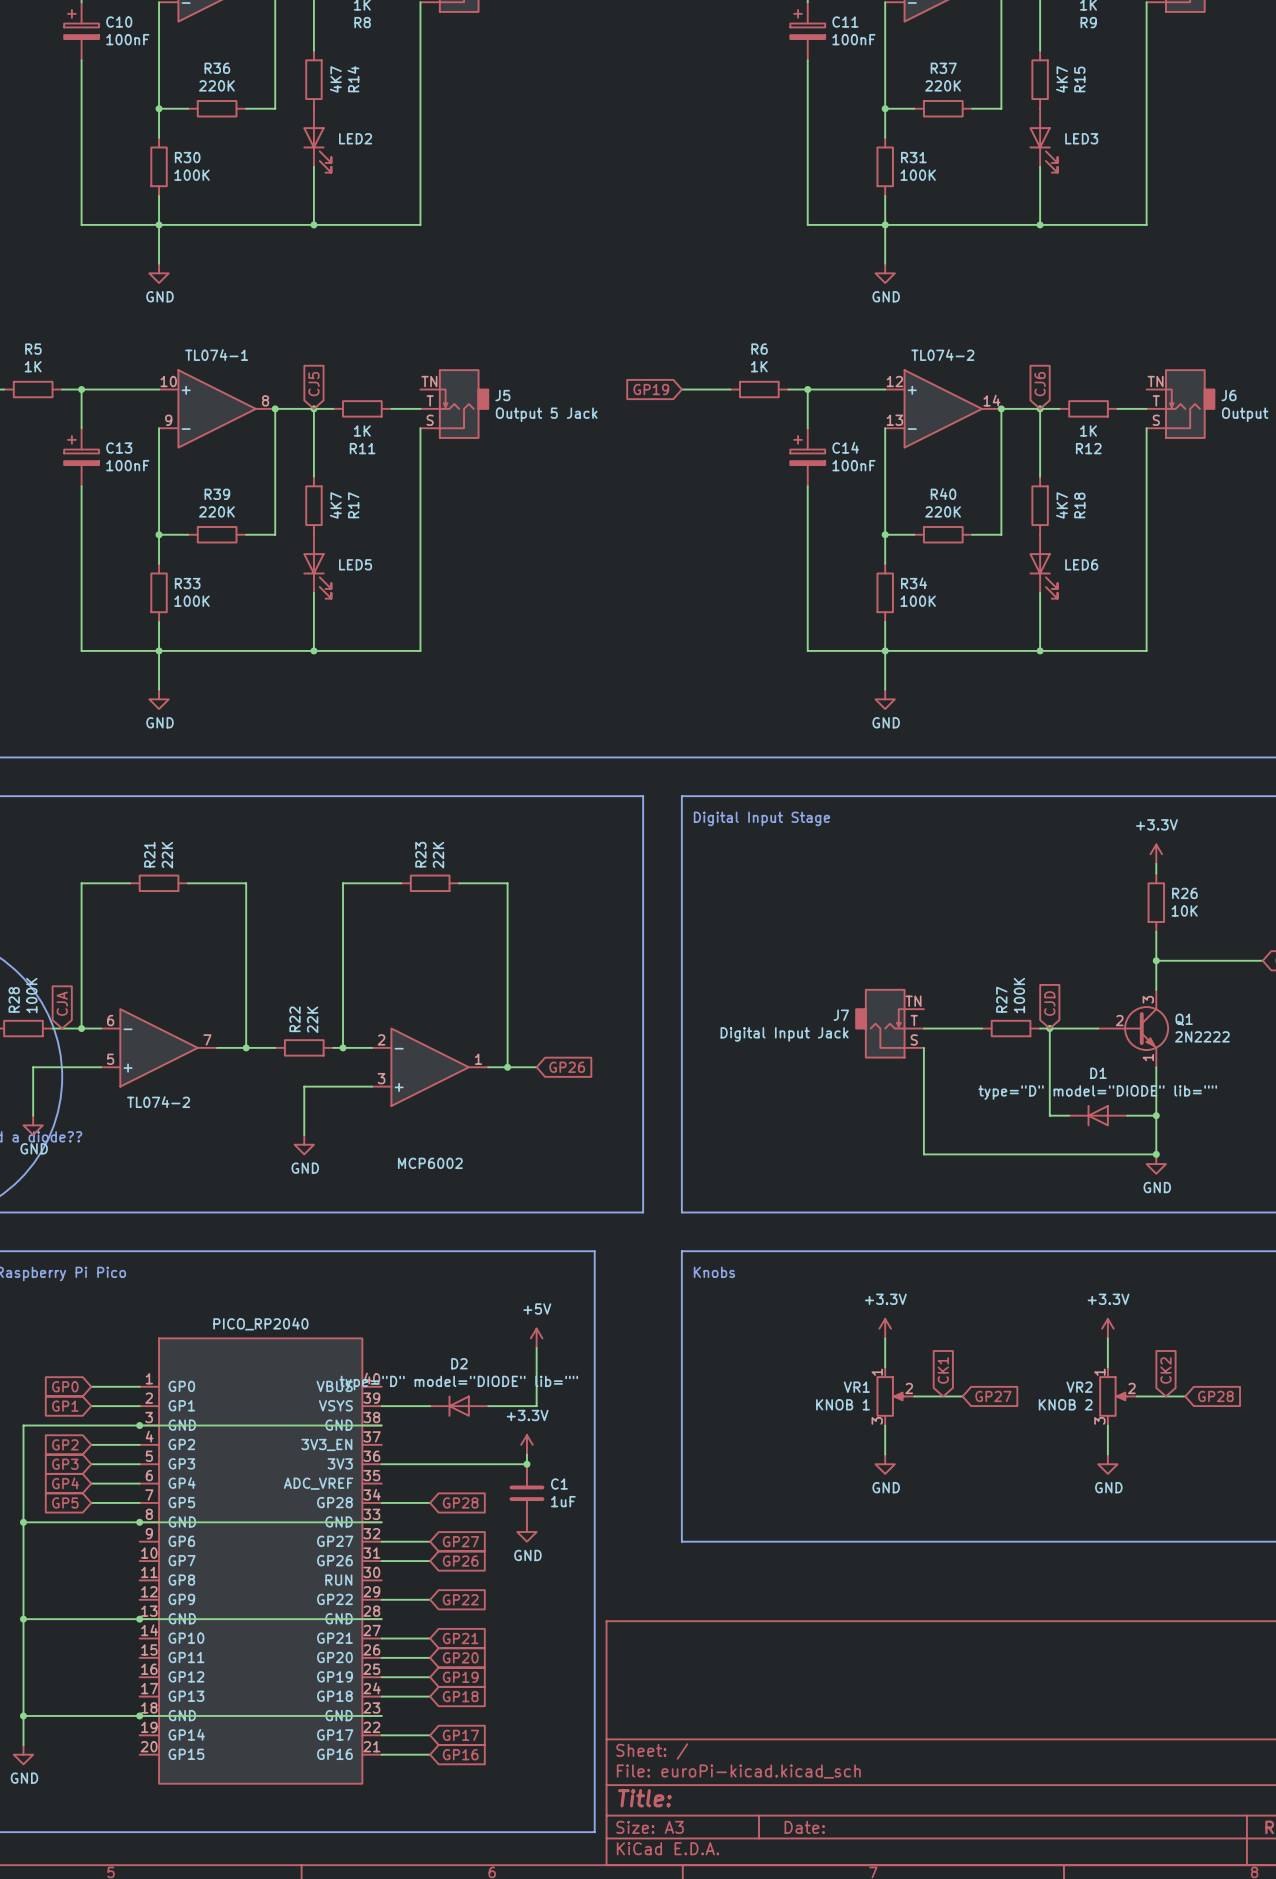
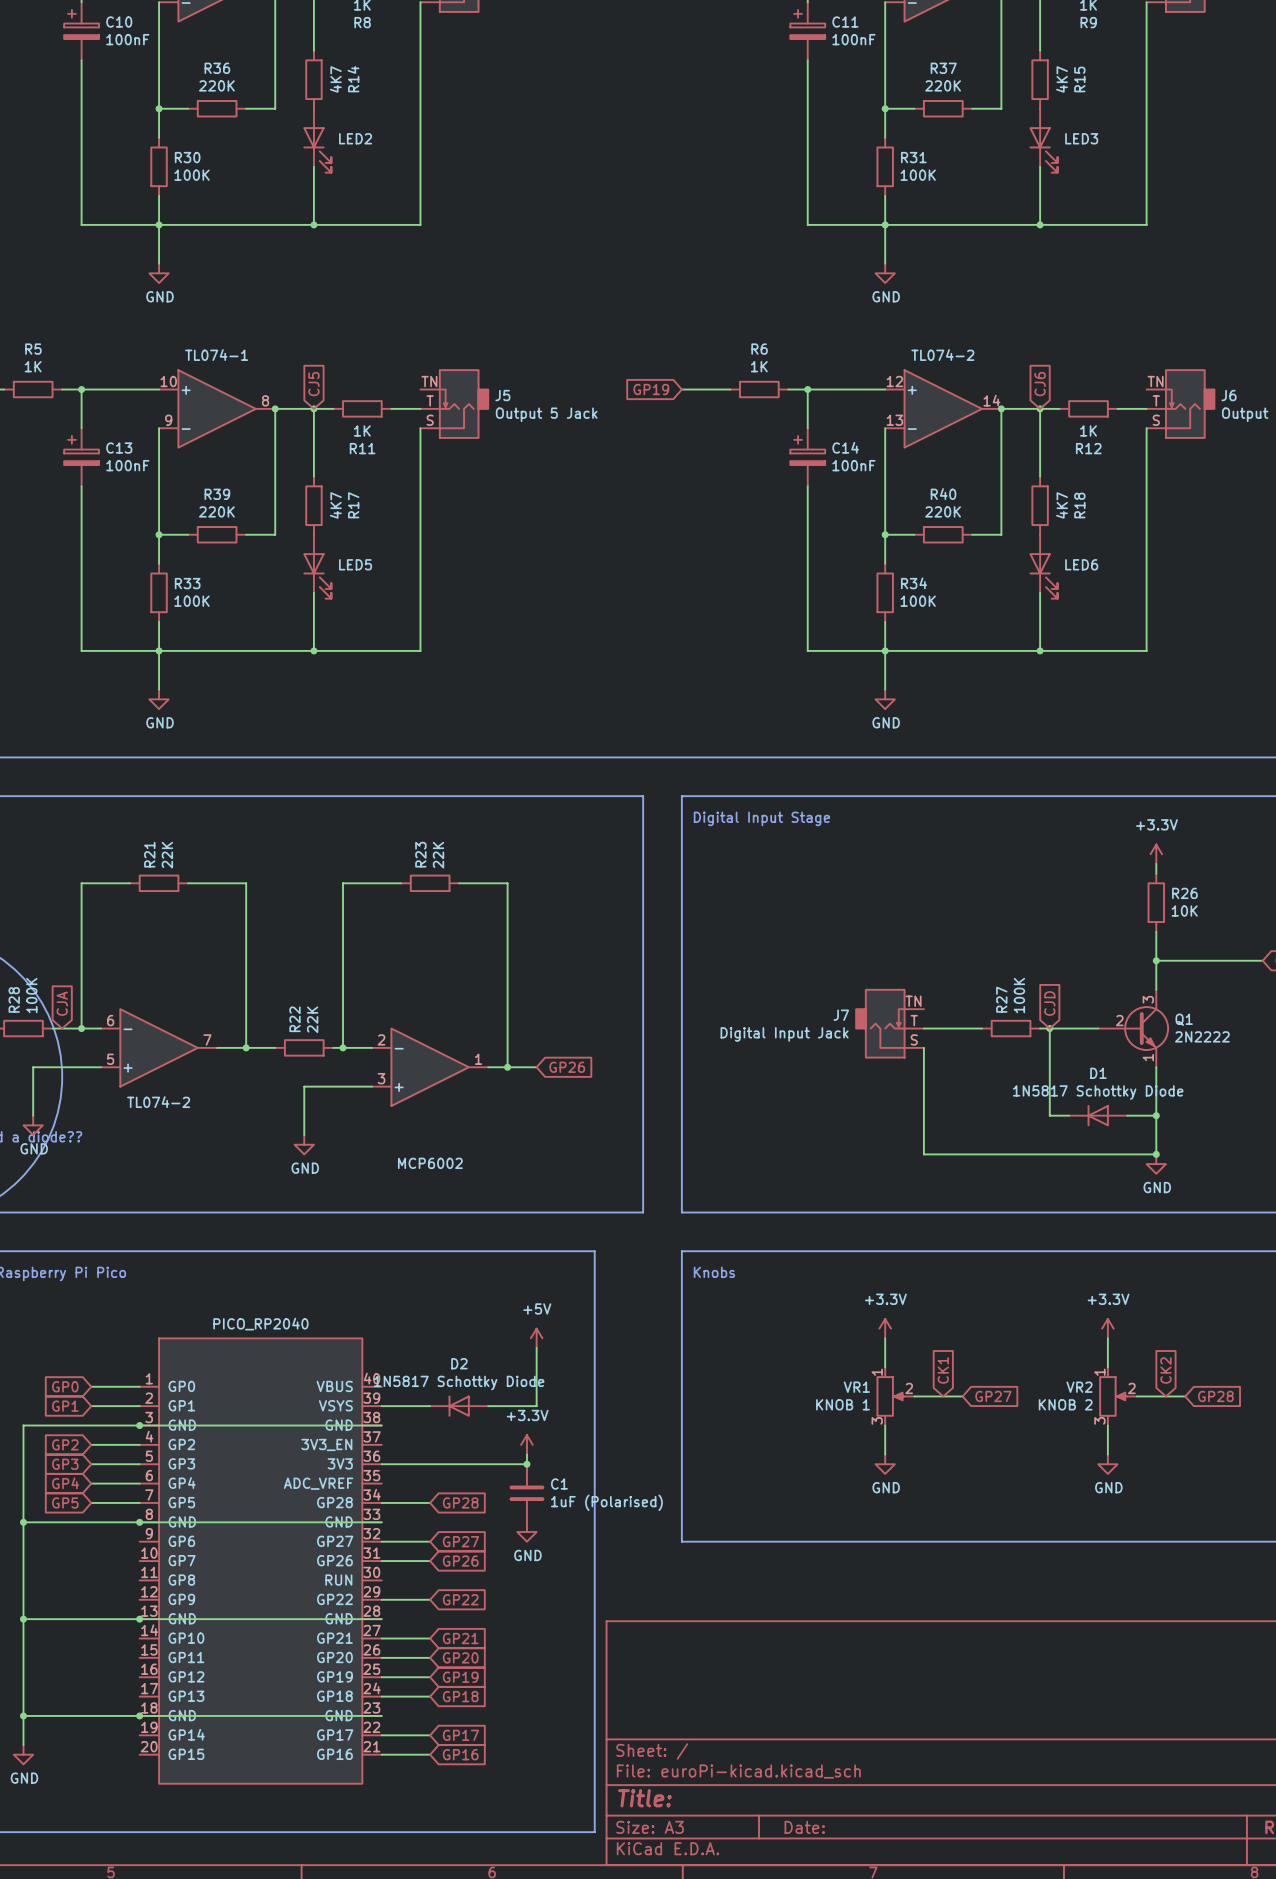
D1 value: type="D" model="DIODE" lib="" (1097, 1092) -> 1N5817 Schottky Diode (1098, 1092)
D2 value: type="D" model="DIODE" lib="" (458, 1382) -> 1N5817 Schottky Diode (459, 1382)
C1 value: 1uF (563, 1501) -> 1uF (Polarised) (606, 1502)

